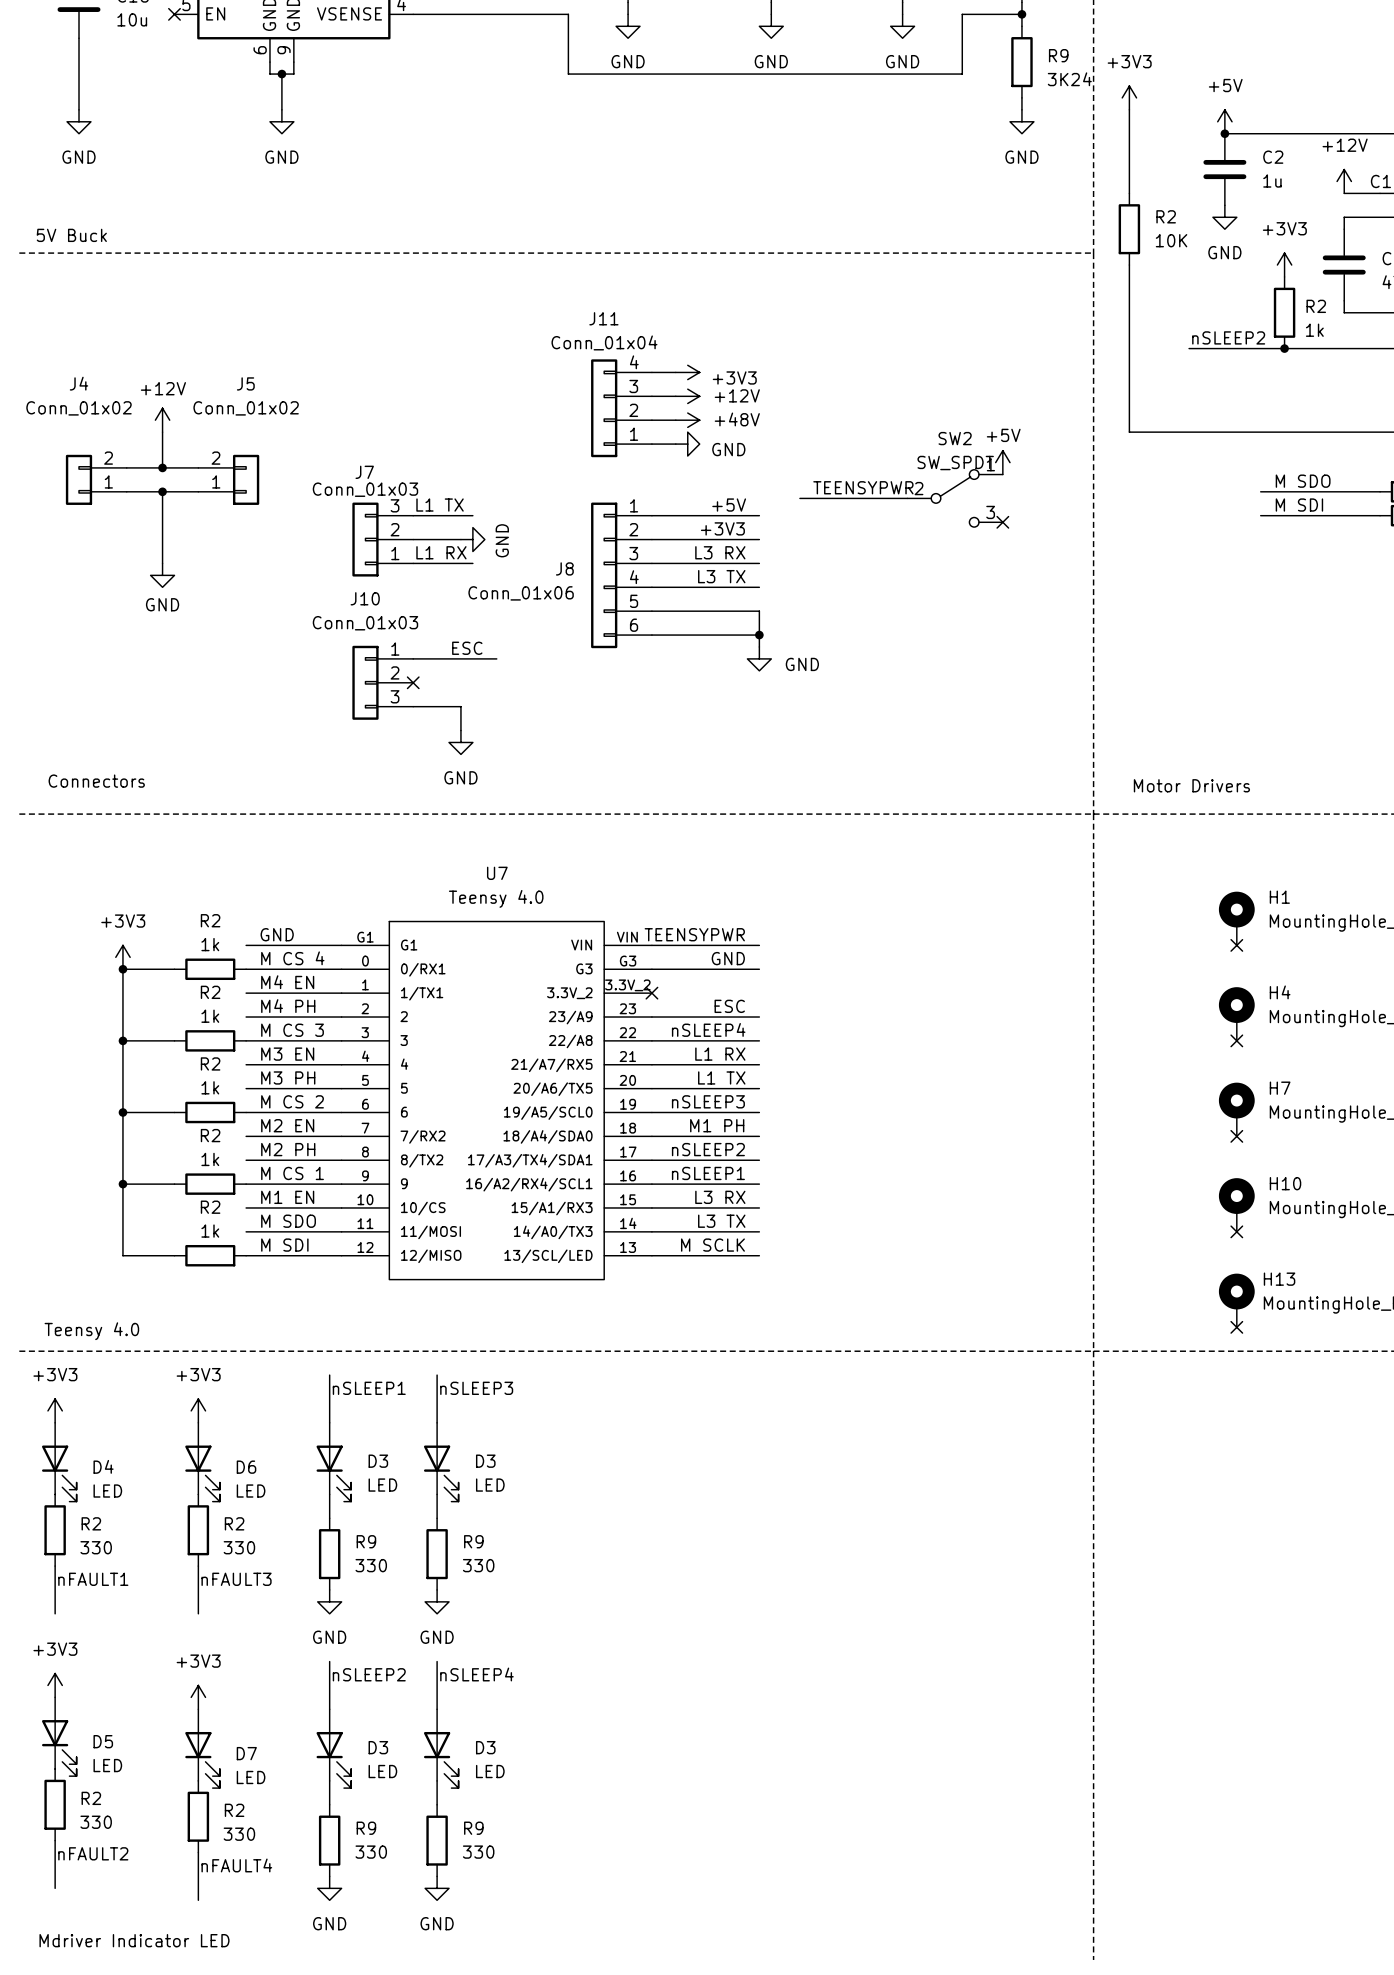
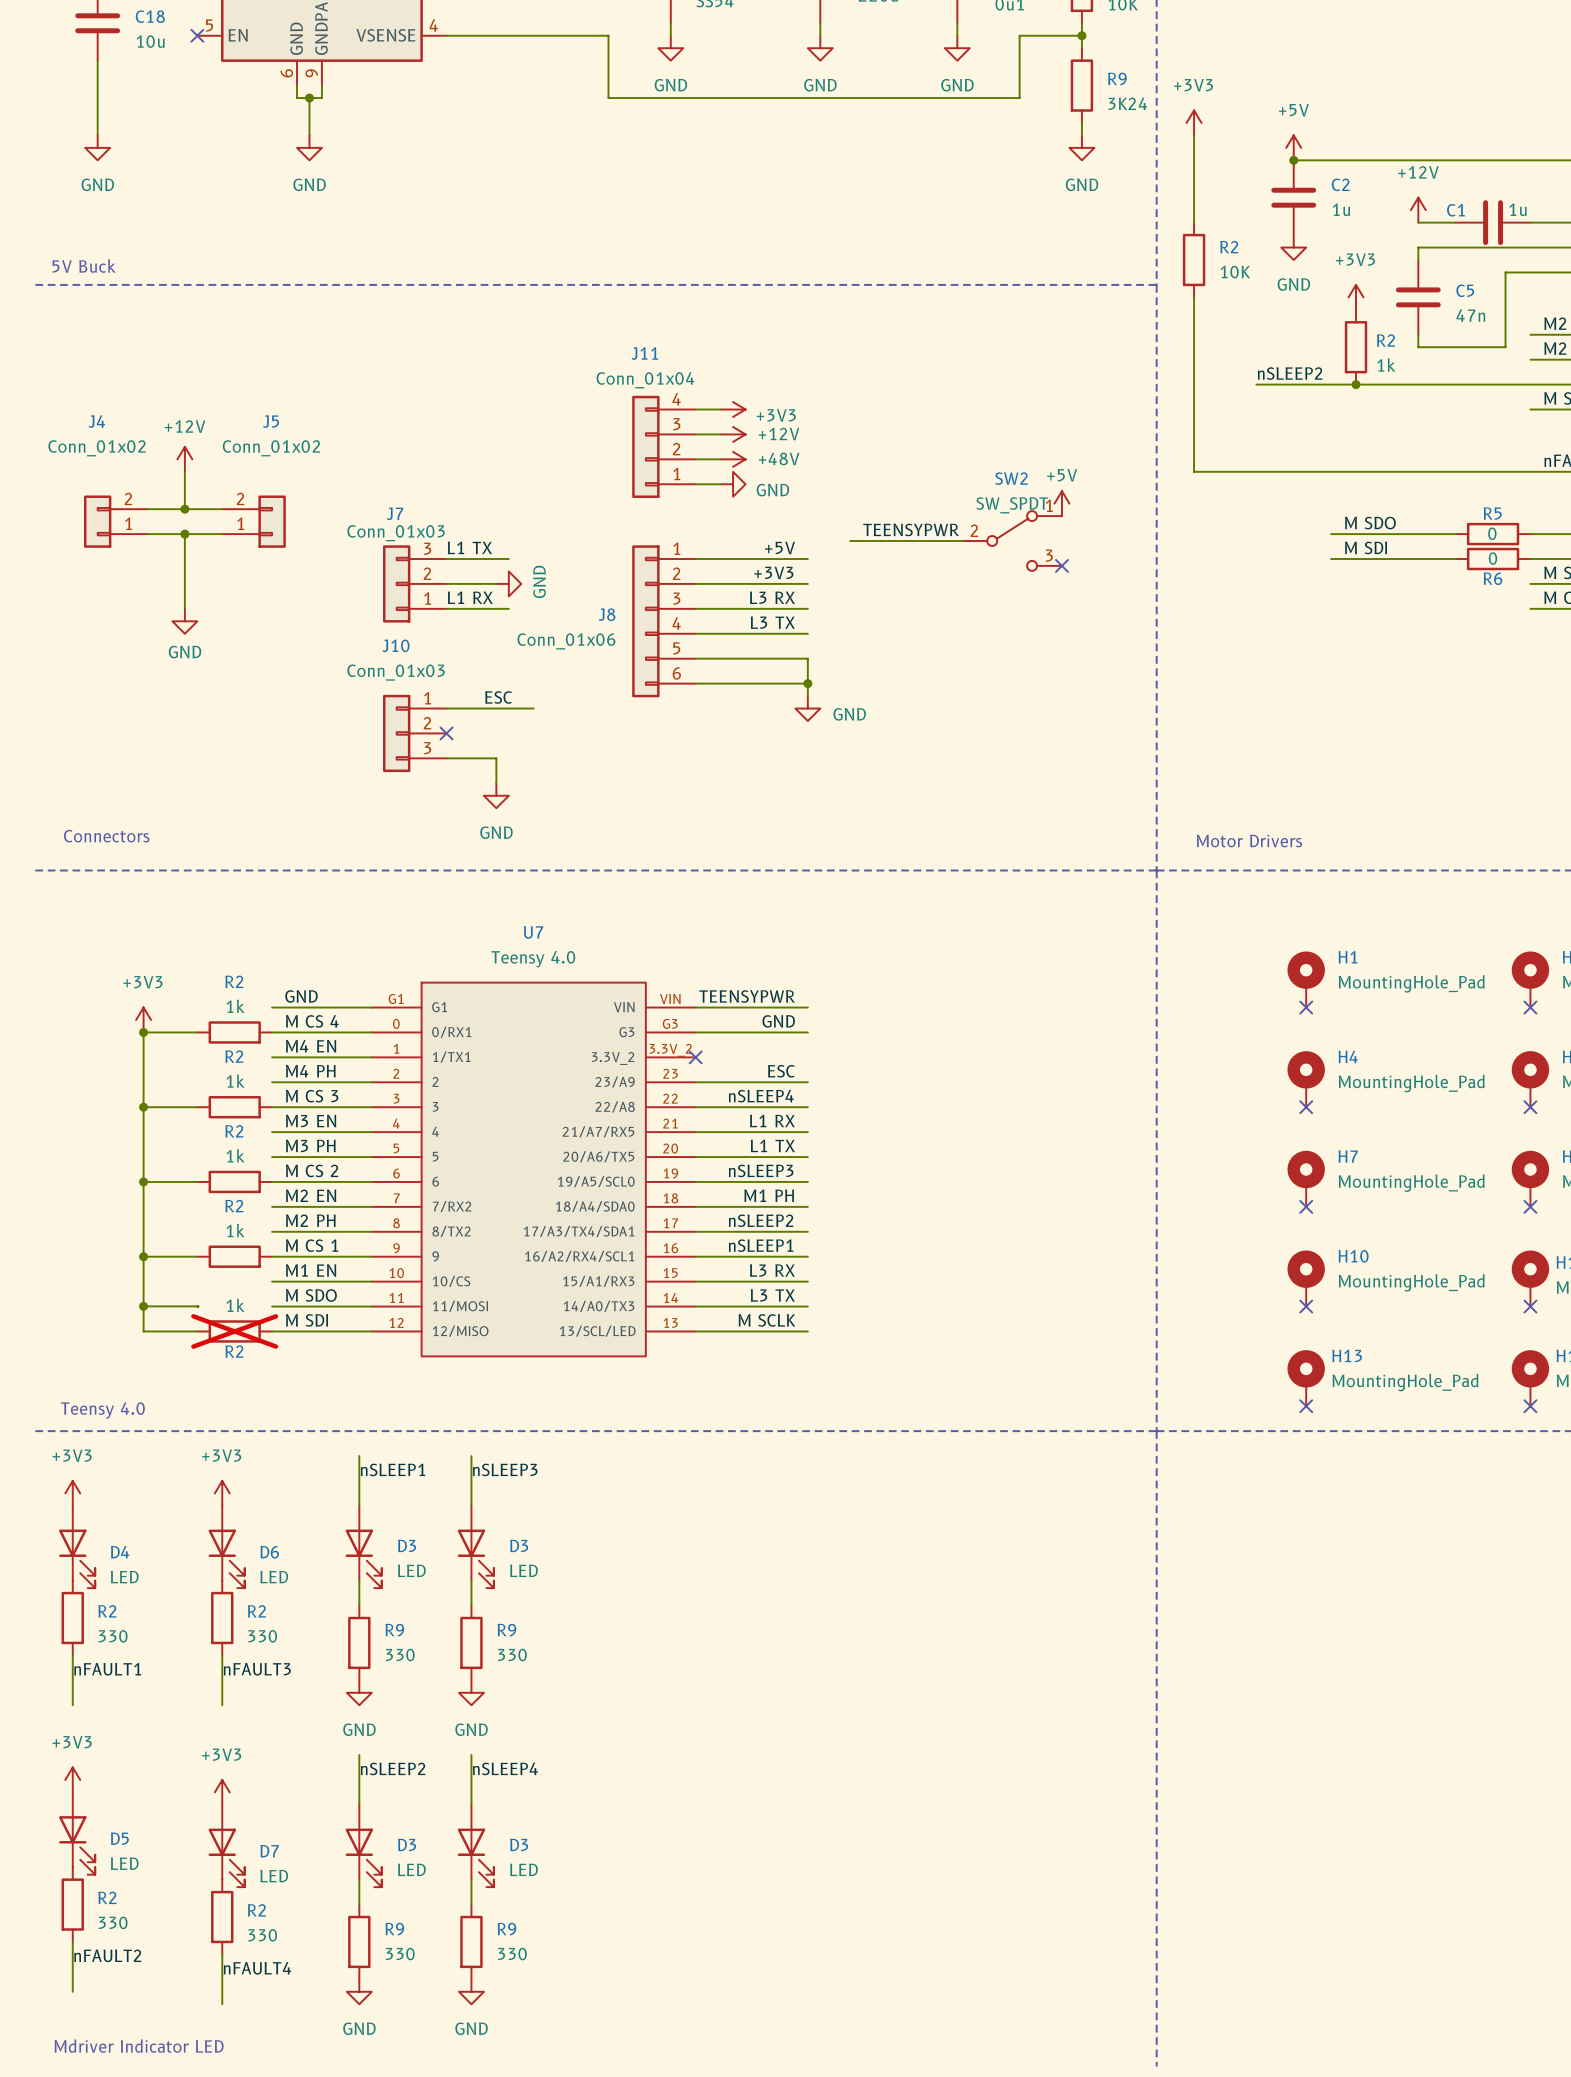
R2 name position: R2 (210, 1207) -> R2 (234, 1351)
wire: none -> (143, 1306) (198, 1306)
junction: none -> (143, 1306)
R2 do-not-place cross: none -> (234, 1331)

